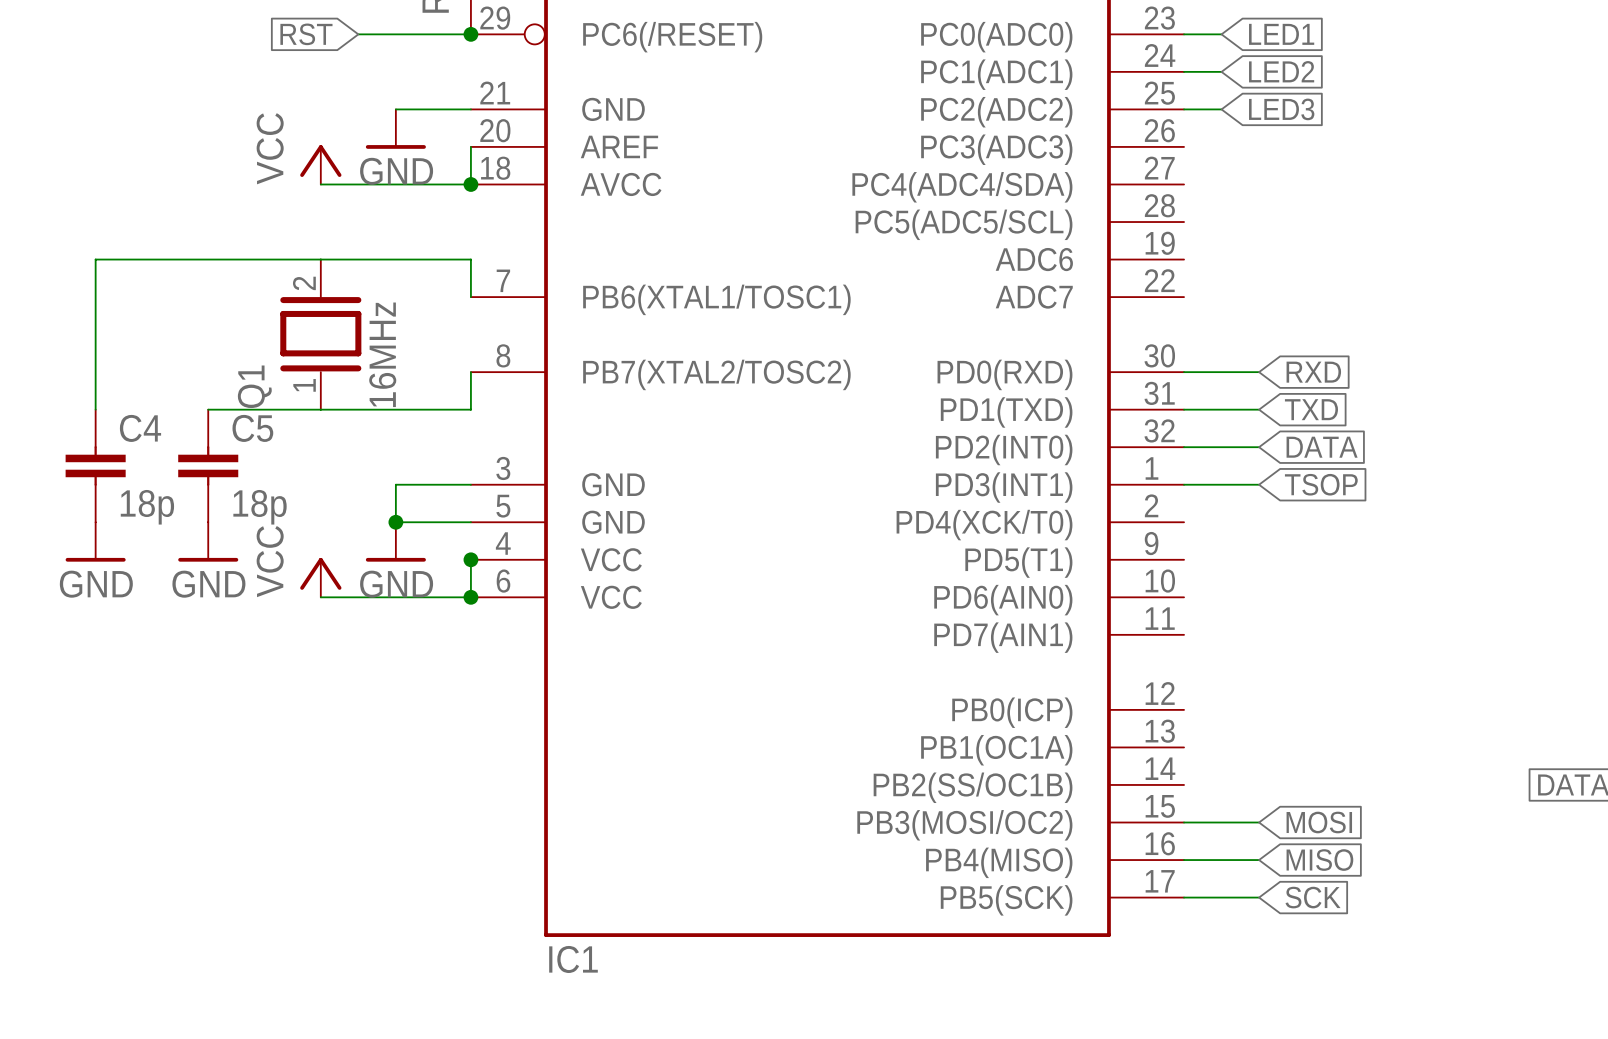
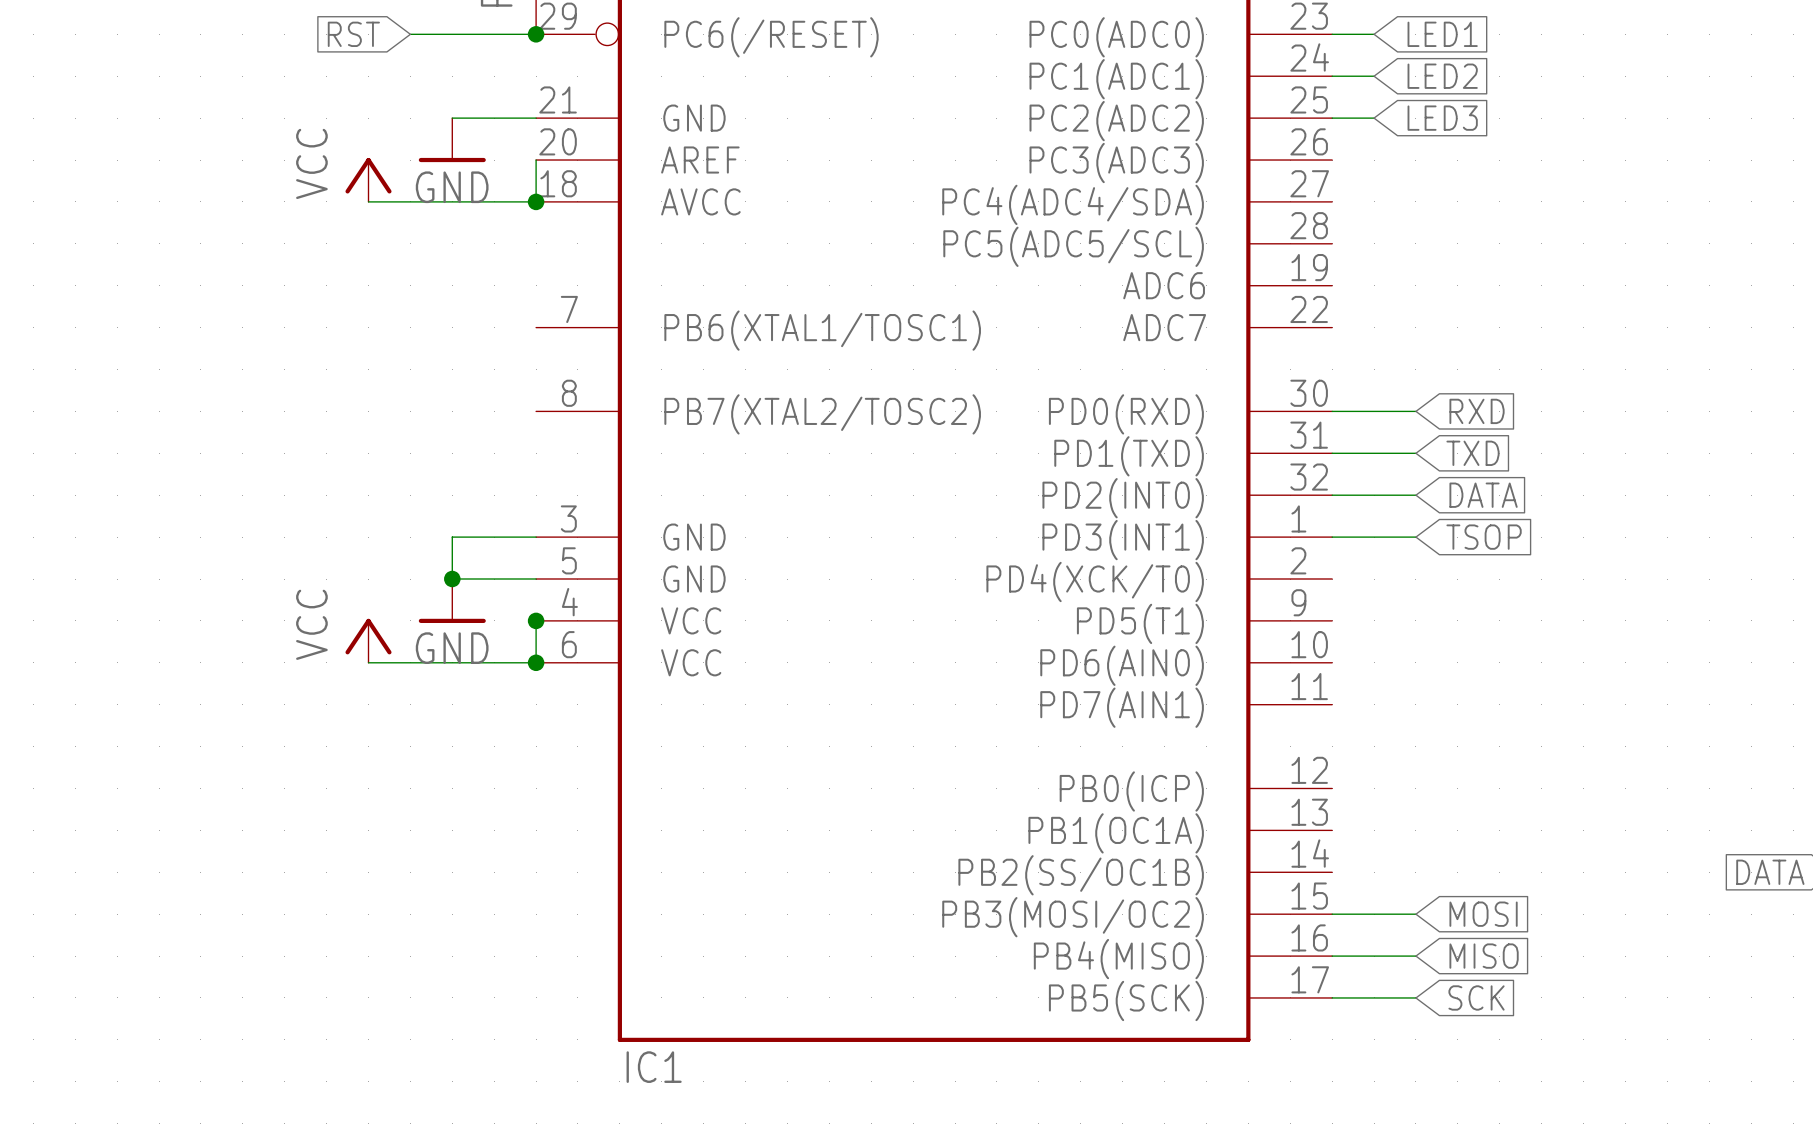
wire: (470, 297) (470, 259) (95, 259) (95, 409) -> none
Q1: 16MHz (320, 334) -> none
wire: (470, 372) (470, 409) (208, 409) -> none
C4: 18p (95, 465) -> none
C5: 18p (208, 465) -> none
power symbol: GND (95, 541) -> none
power symbol: GND (208, 541) -> none

